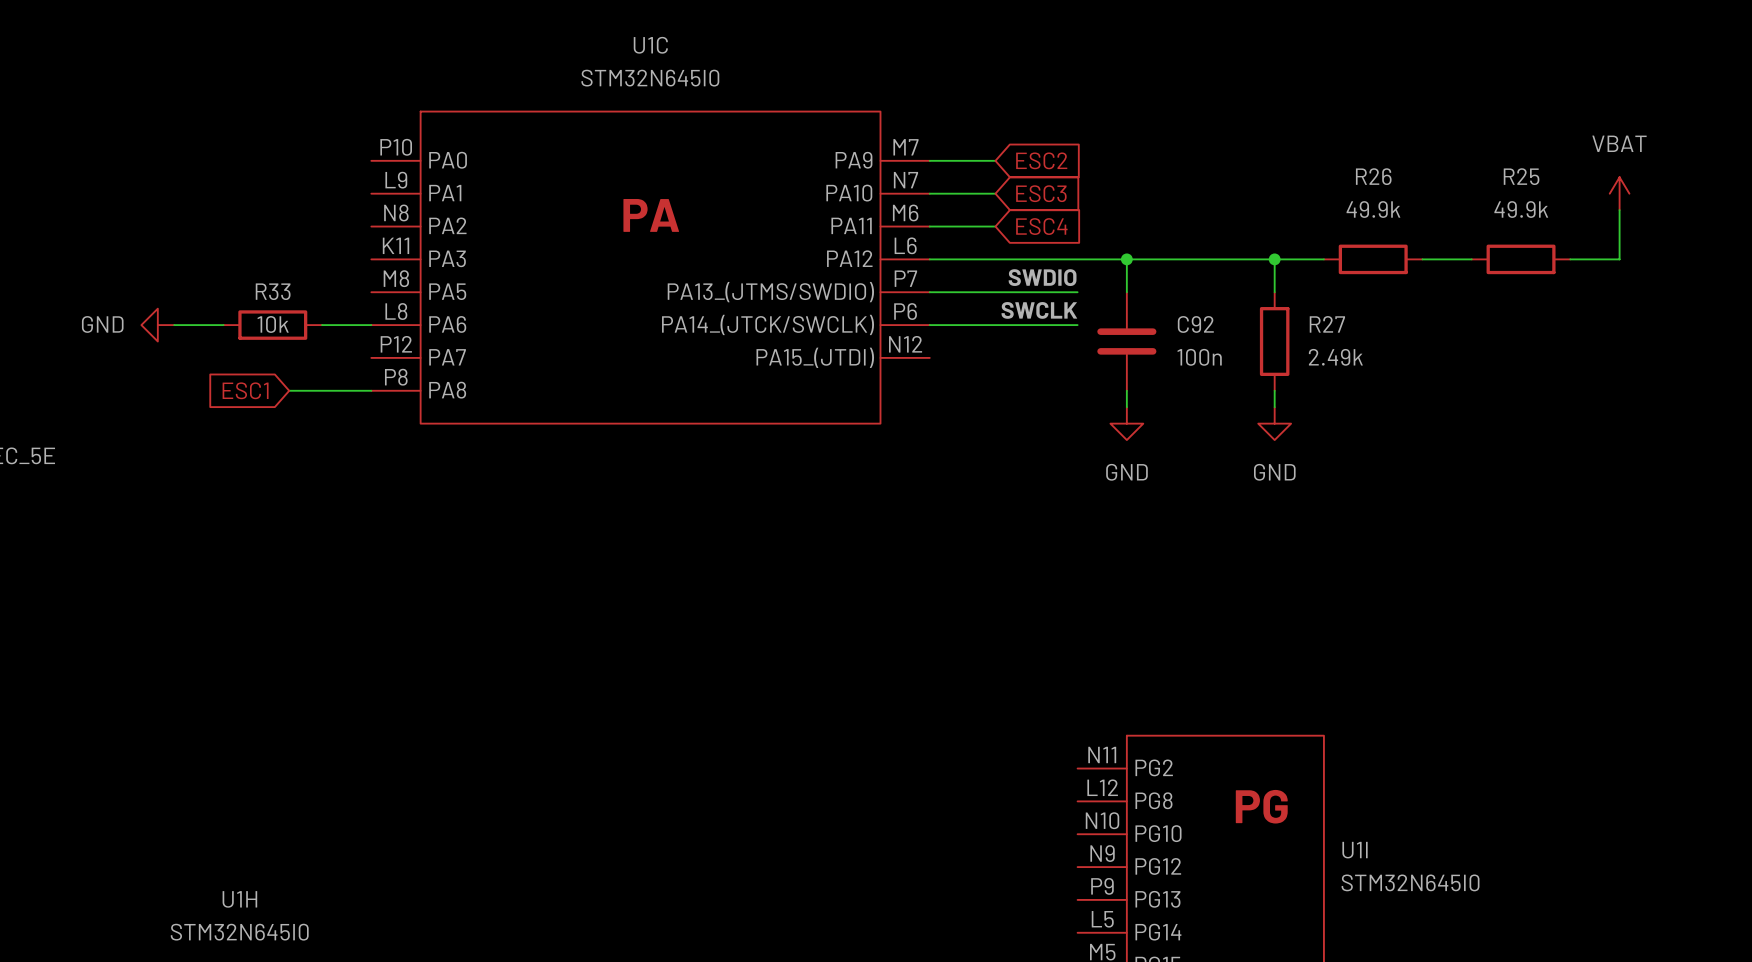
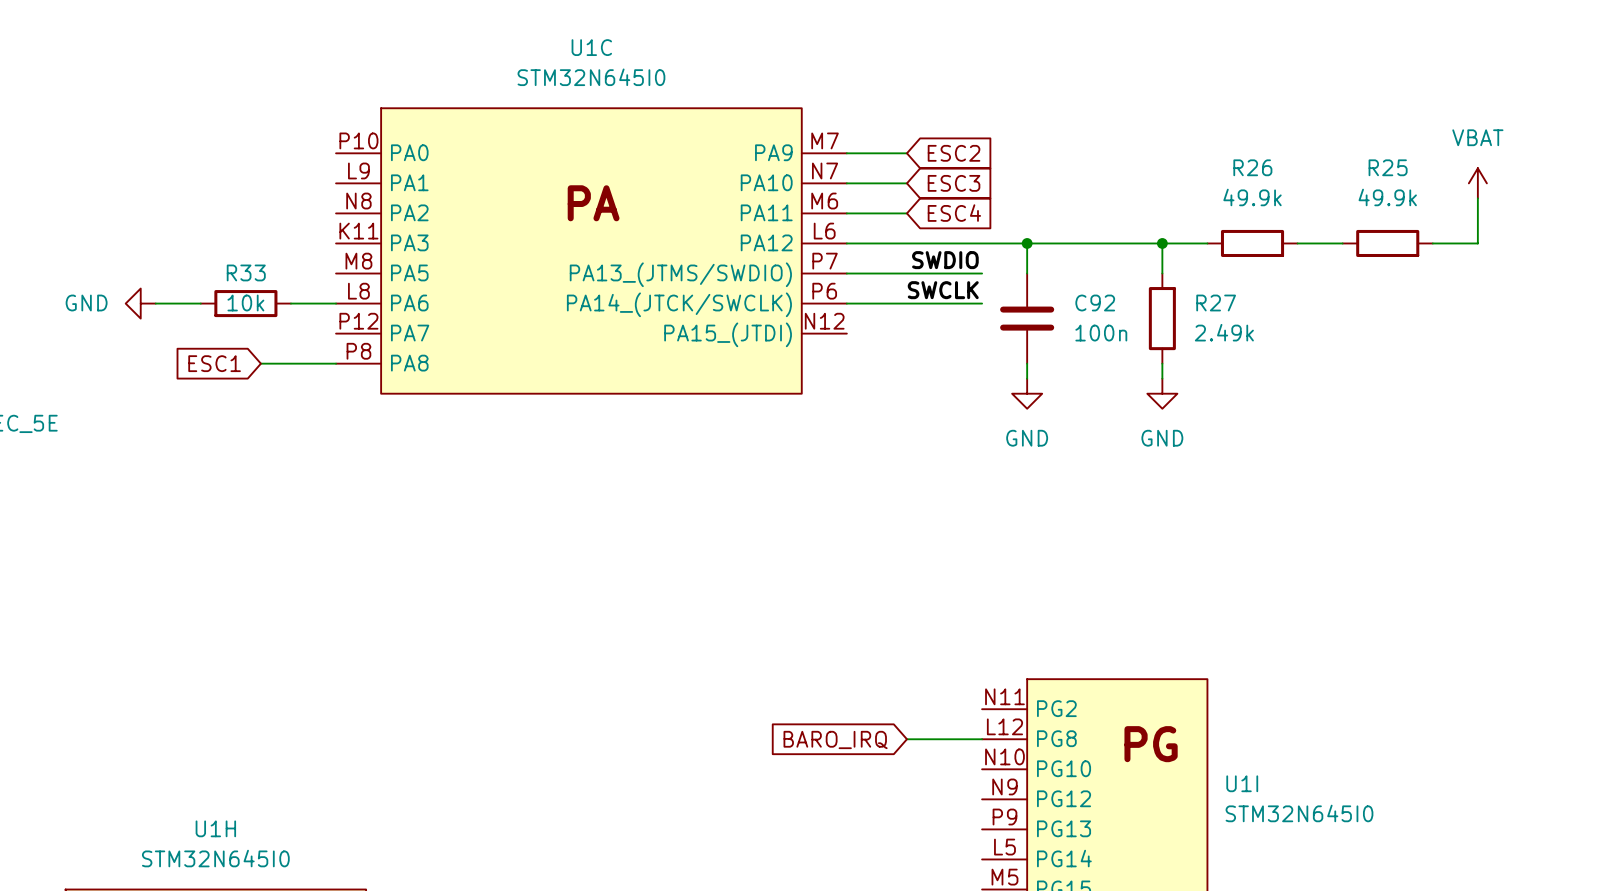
wire: none -> (906, 739) (982, 739)
global label: none -> BARO_IRQ (835, 739)

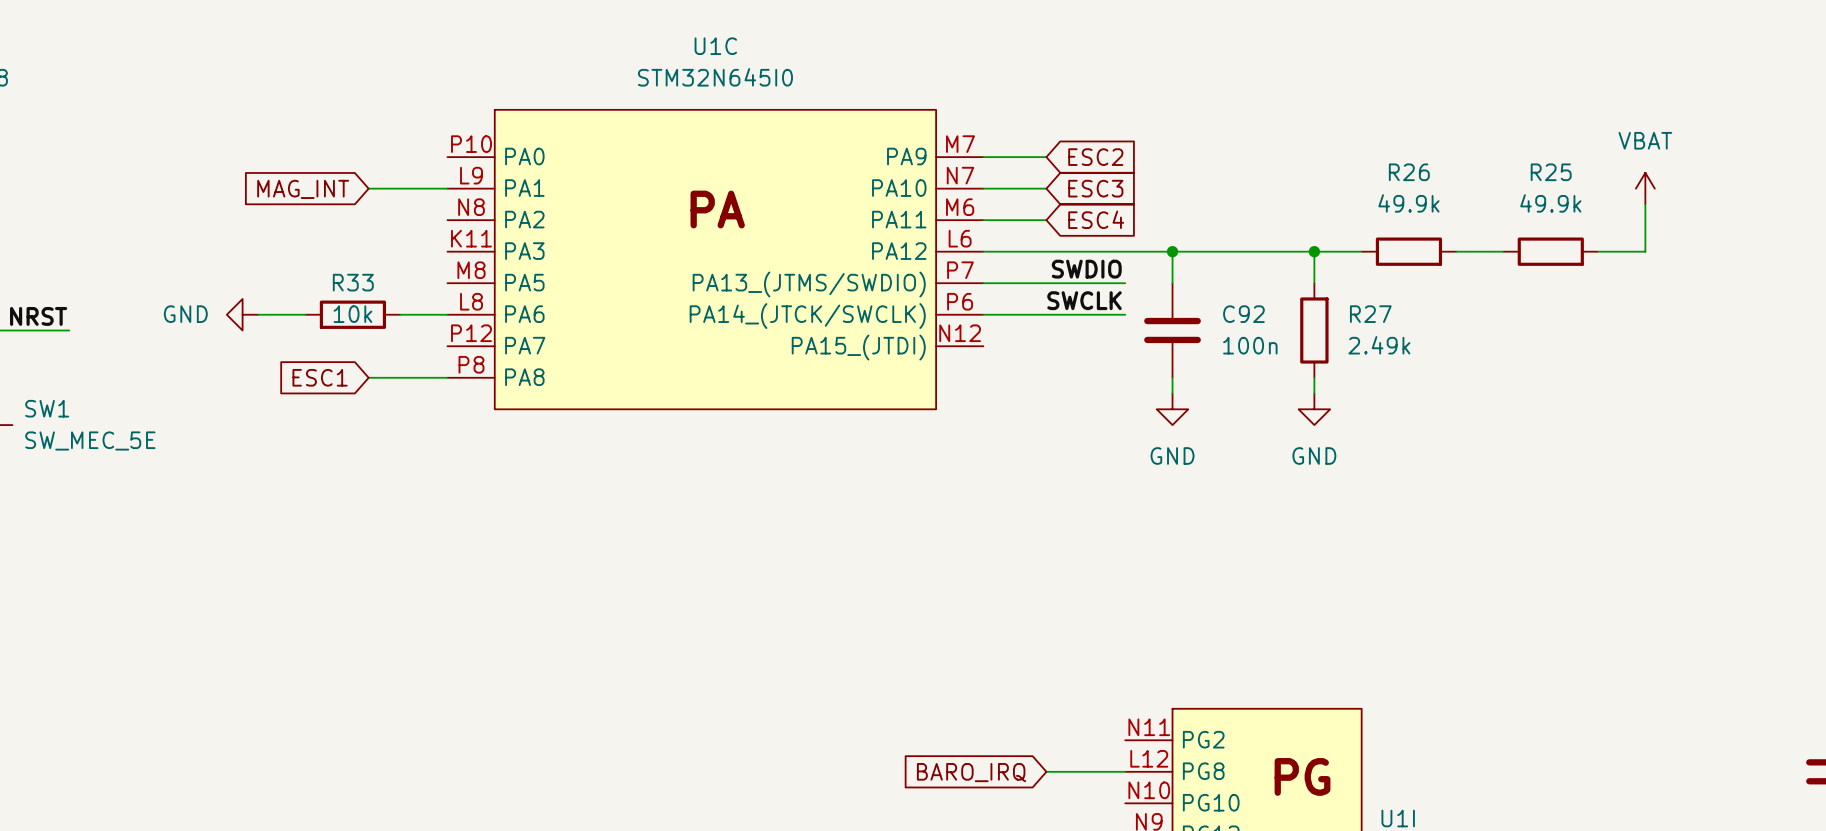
wire: none -> (368, 188) (447, 188)
global label: none -> MAG_INT (303, 189)

